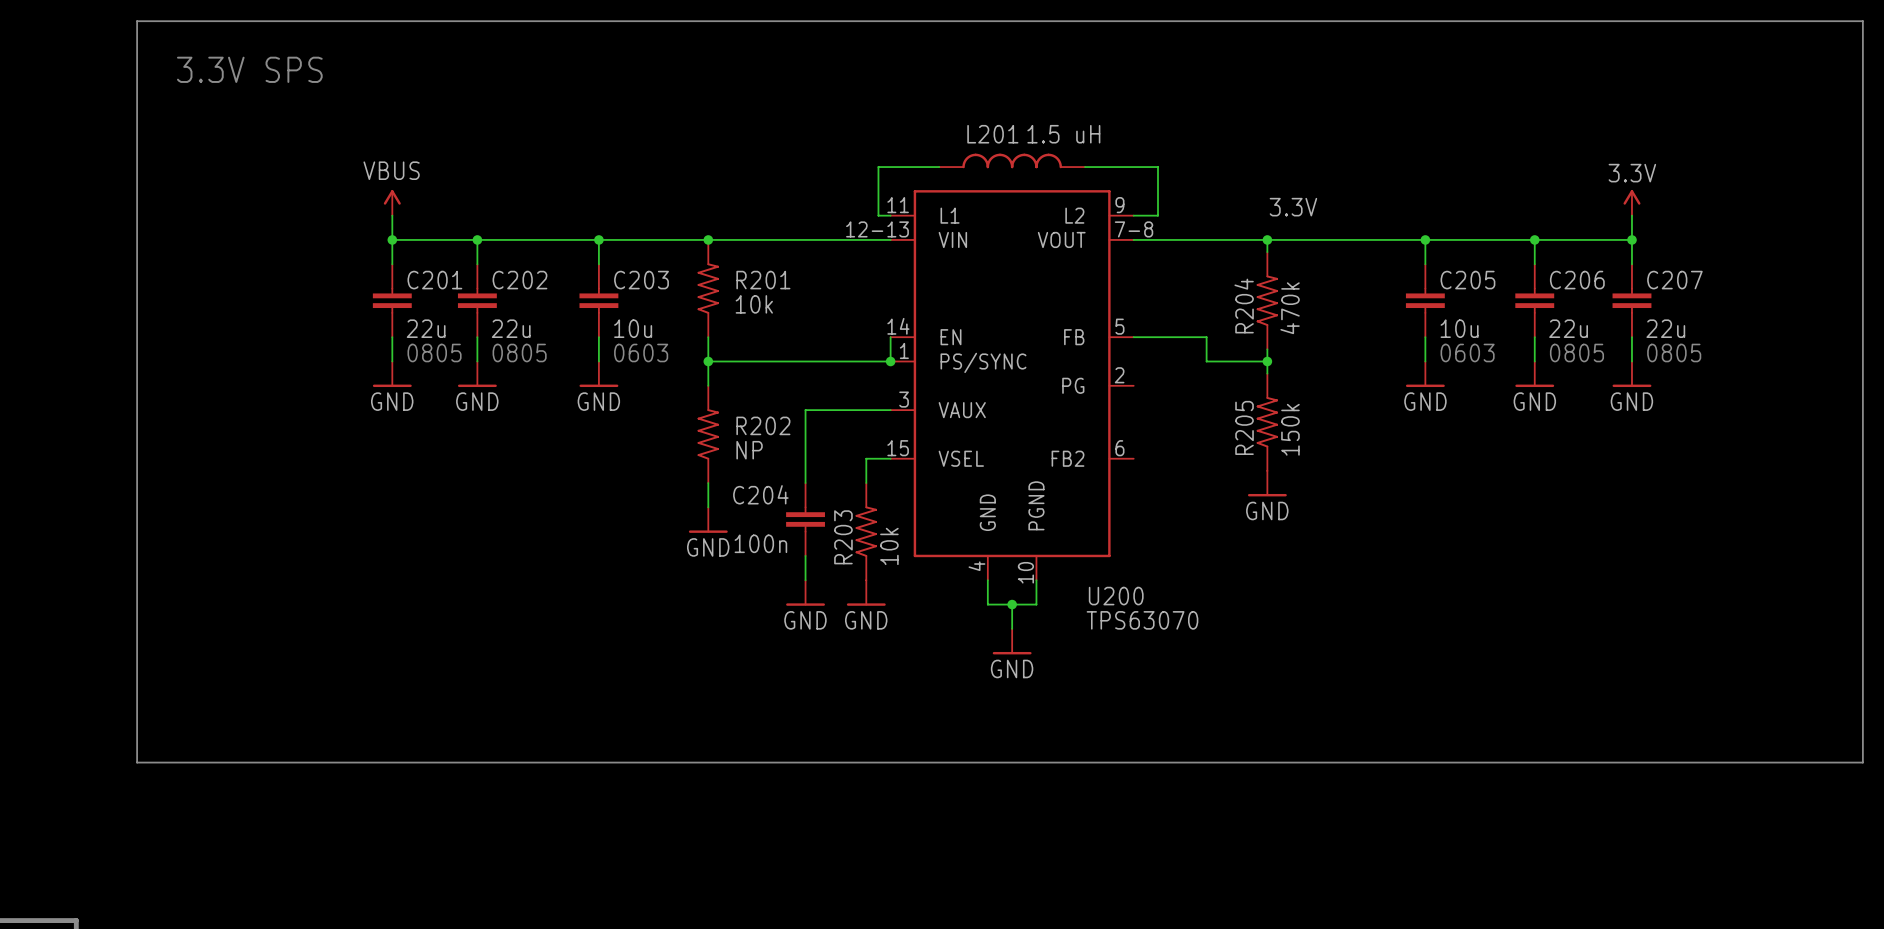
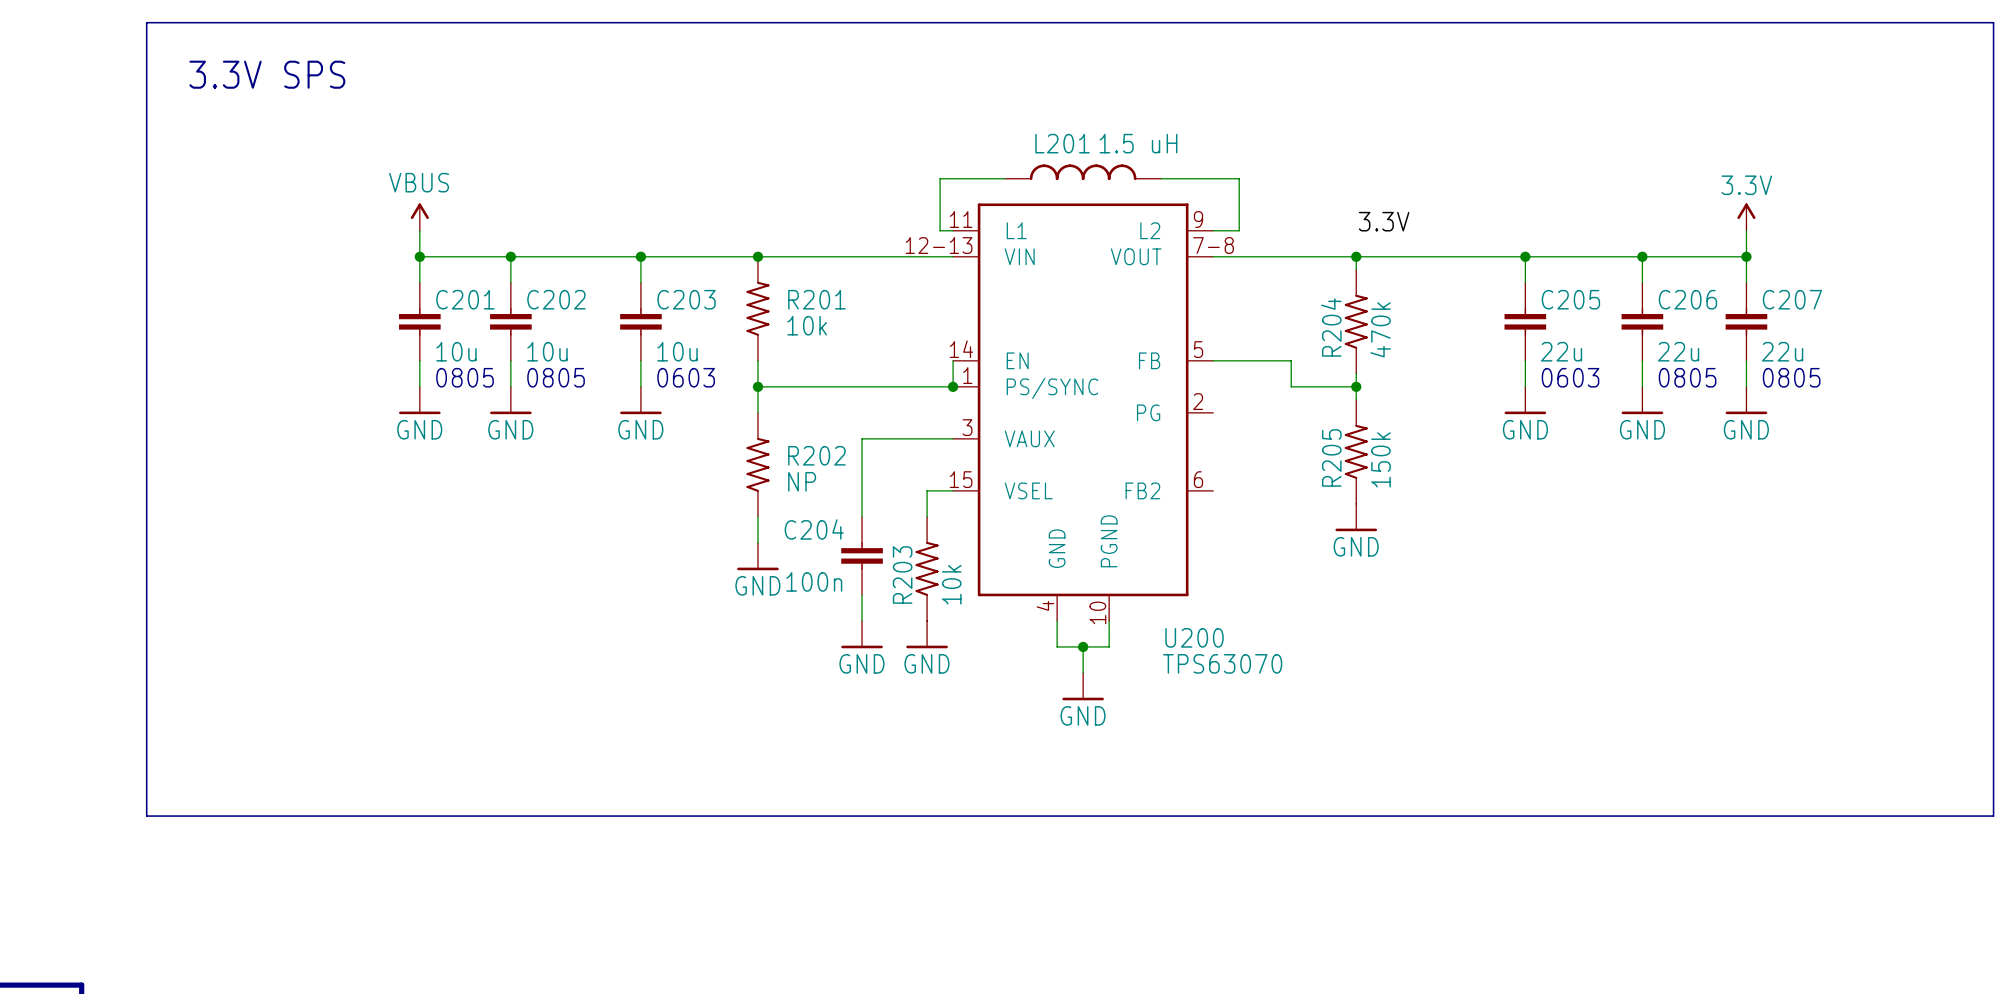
C201 value: 22u (426, 328) -> 10u (456, 351)
C202 value: 22u (511, 328) -> 10u (547, 351)
C205 value: 10u (1459, 328) -> 22u (1561, 351)

